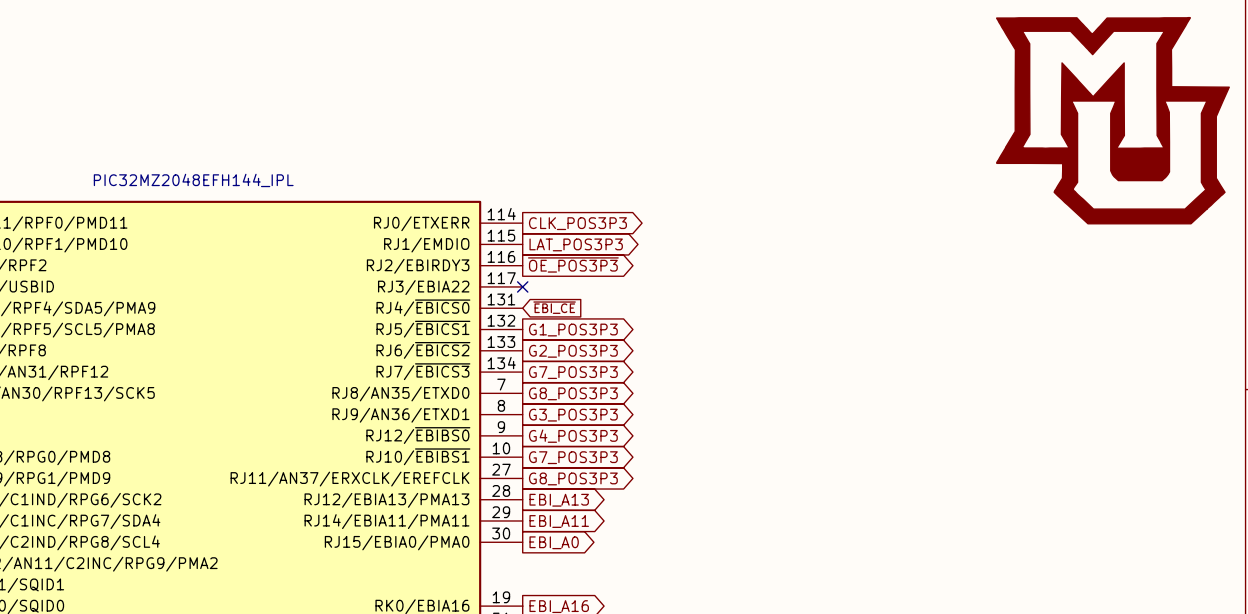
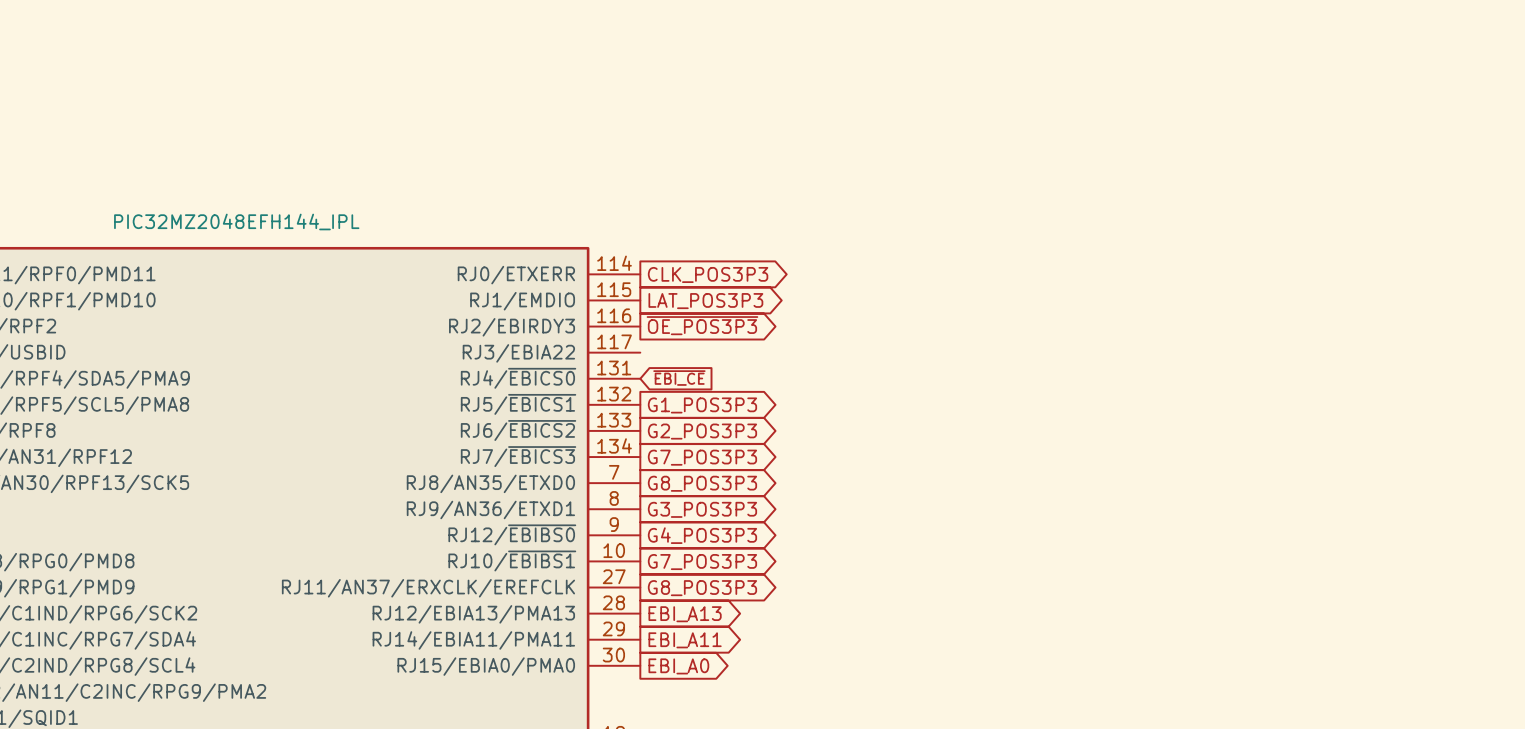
power symbol: (1113, 120) -> none
no-connect mark: (522, 286) -> none

